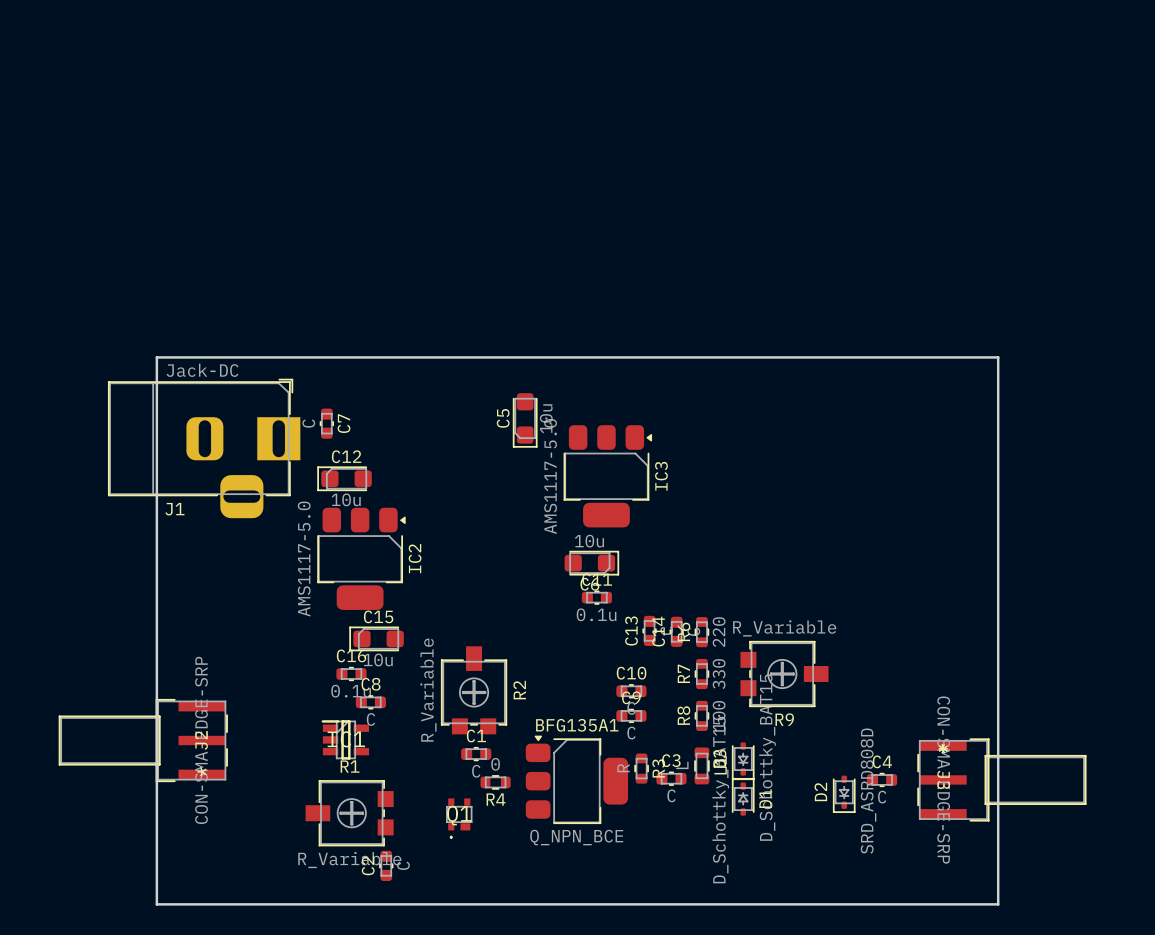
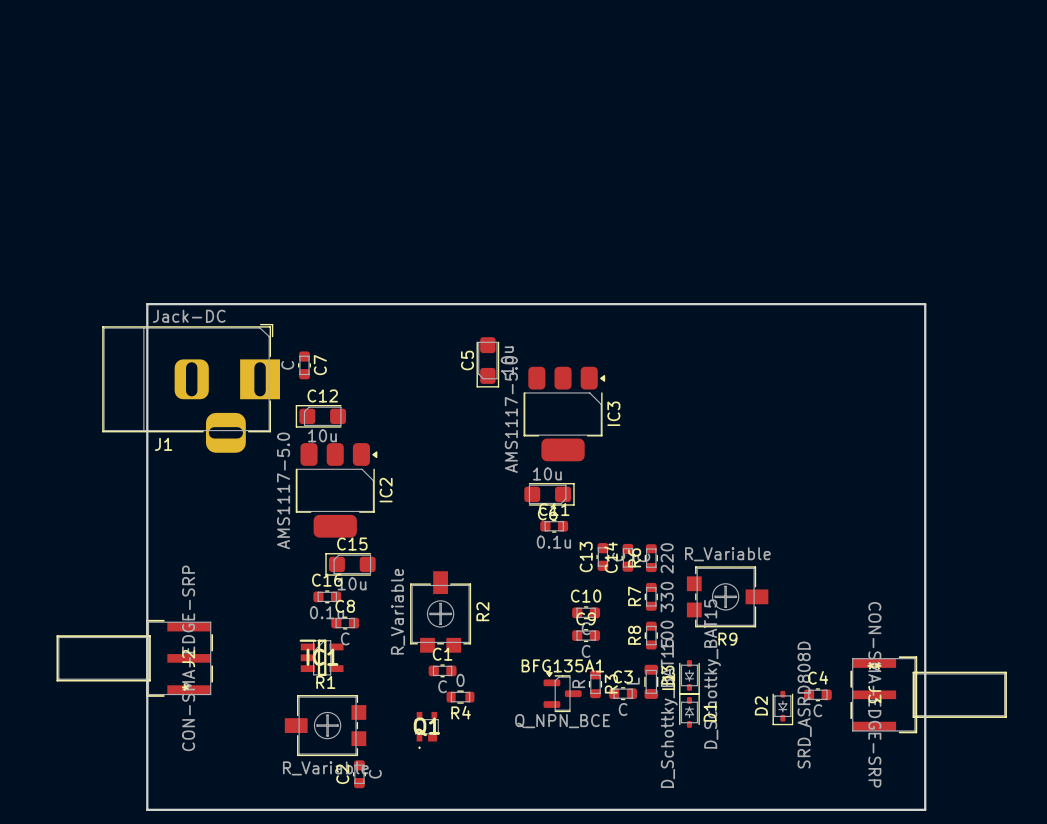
BFG135A1 name position: BFG135A1 (577, 725) -> BFG135A1 (562, 665)
BFG135A1 footprint: [525, 735, 629, 824] -> [543, 672, 582, 713]
BFG135A1 value position: Q_NPN_BCE (576, 837) -> Q_NPN_BCE (562, 721)

